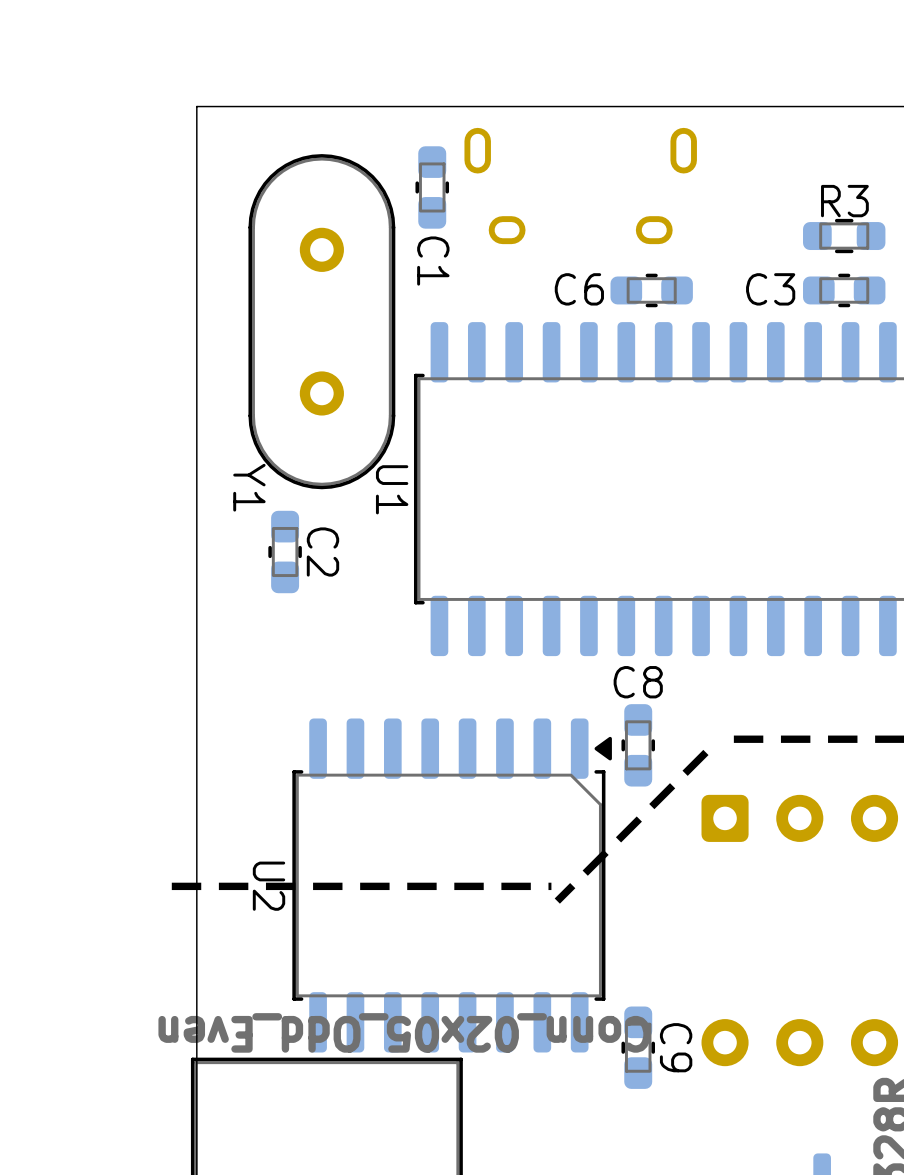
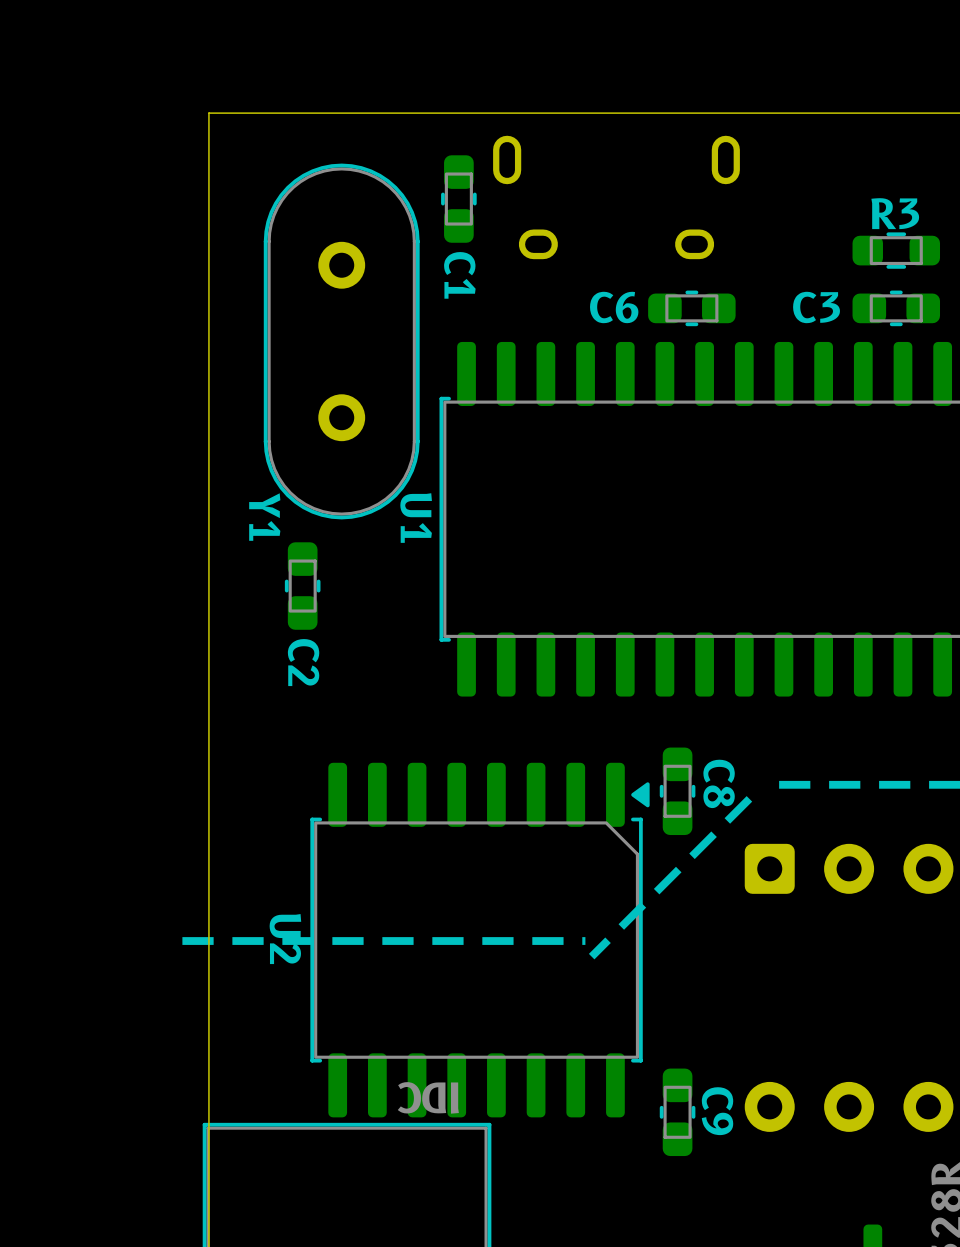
C2 name position: C2 (322, 552) -> C2 (303, 662)
C8 name rotation: 0° (638, 682) -> 90° clockwise (719, 783)
part value: Conn_02x05_Odd_Even (404, 1032) -> IDC (428, 1097)

